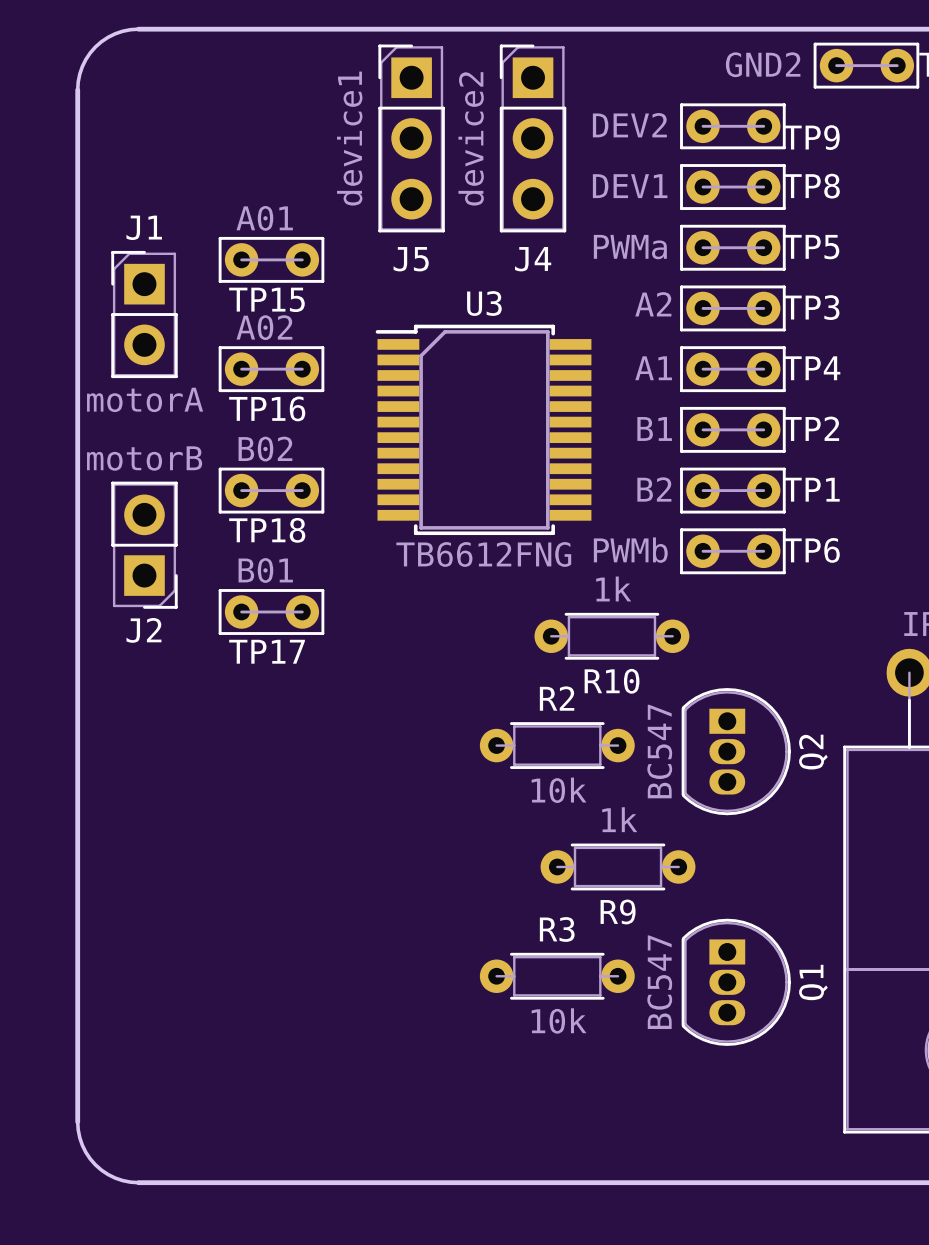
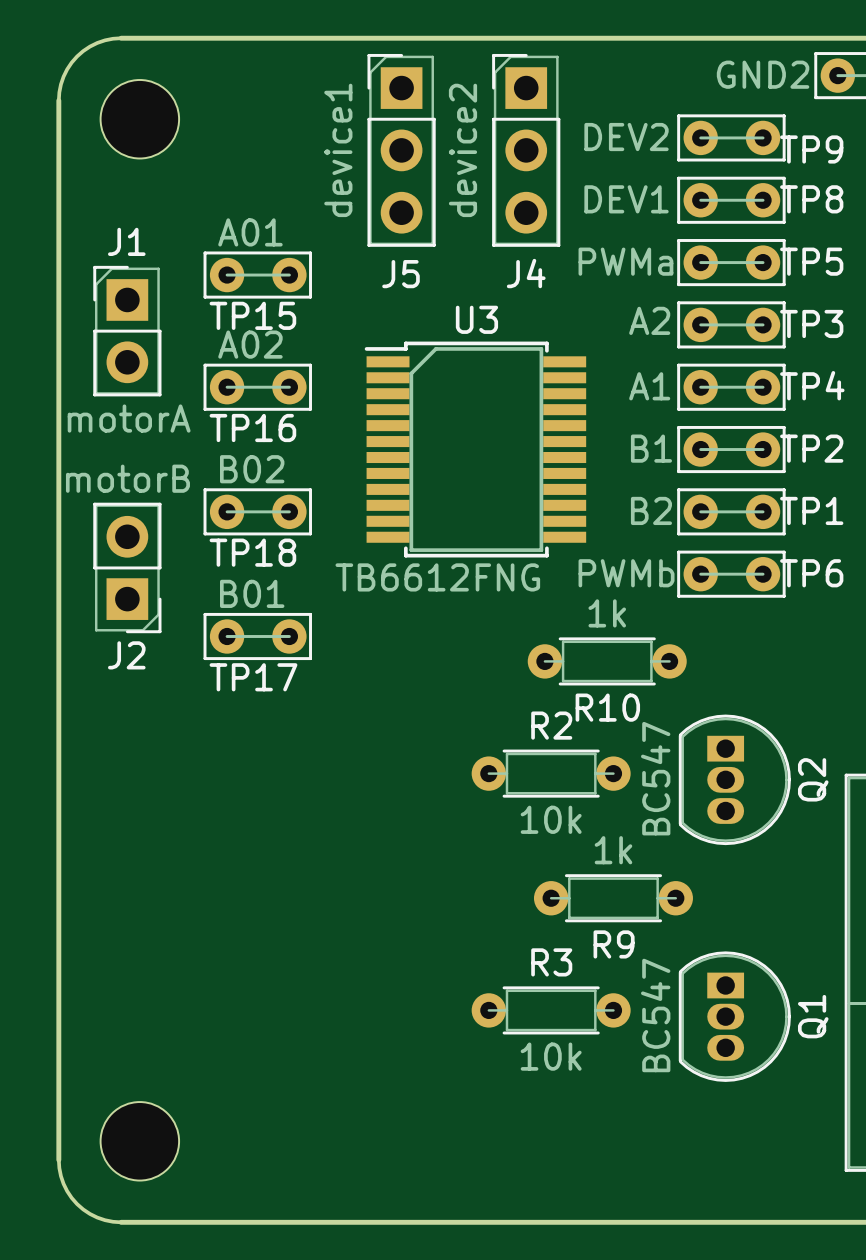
part: none -> (139, 119)
U3 value position: TB6612FNG (483, 554) -> TB6612FNG (437, 577)
part: none -> (139, 1141)

